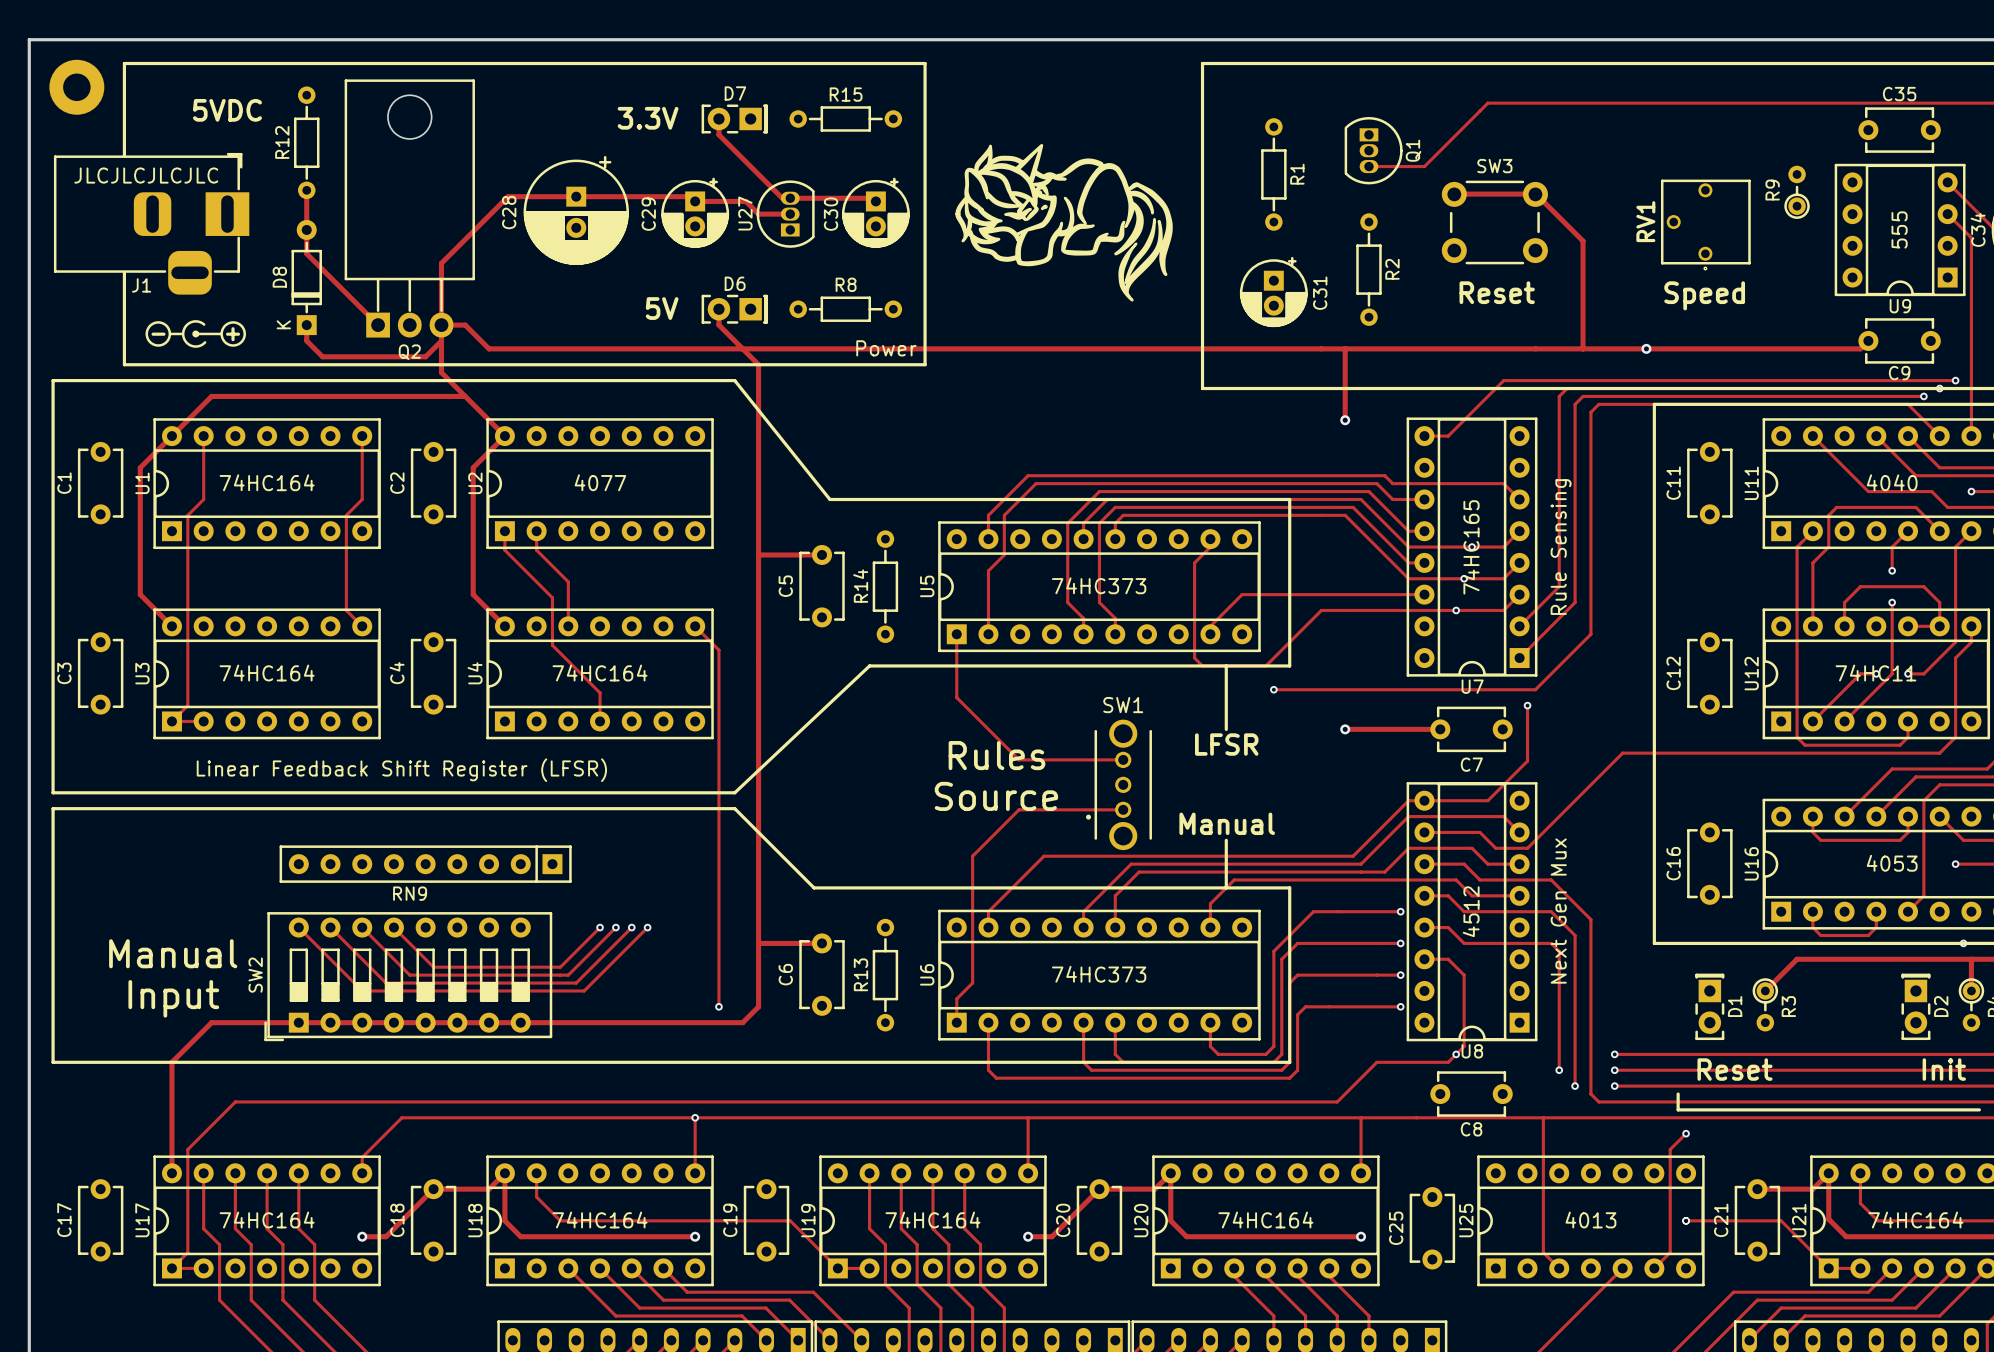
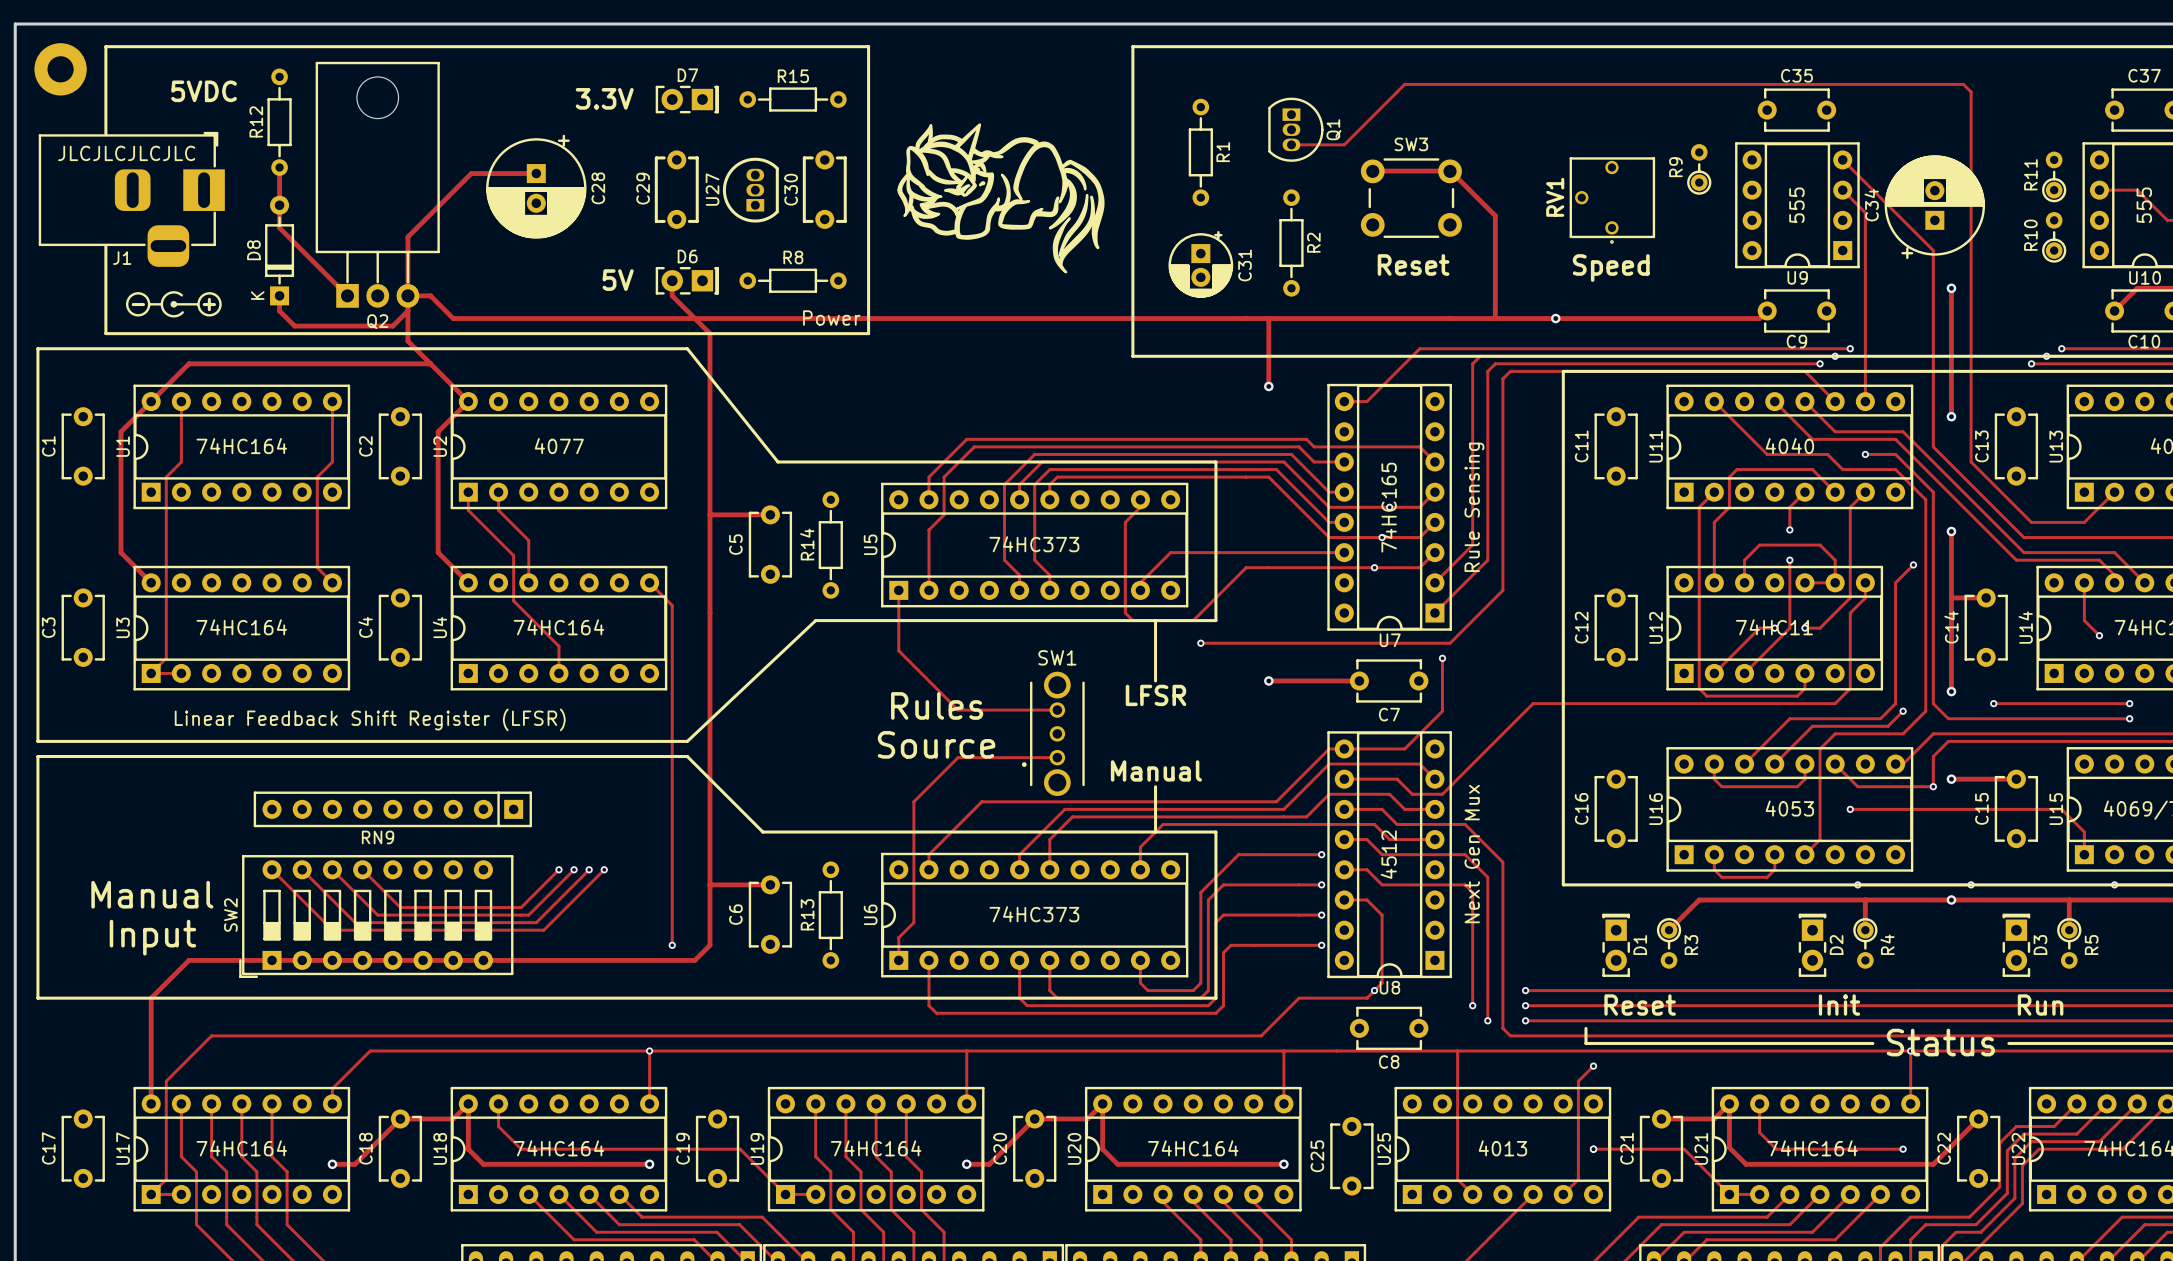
track: (718, 118) (718, 134) (782, 198) (872, 198) (875, 201) -> none
C29 footprint: [661, 177, 730, 248] -> [654, 150, 699, 229]
C30 footprint: [841, 177, 910, 248] -> [802, 150, 847, 229]
U27 footprint: [756, 180, 815, 248] -> [722, 157, 779, 223]
track: (576, 196) (690, 196) (695, 201) (745, 201) (758, 214) (790, 214) -> none
C28 name position: C28 (509, 212) -> C28 (598, 188)

